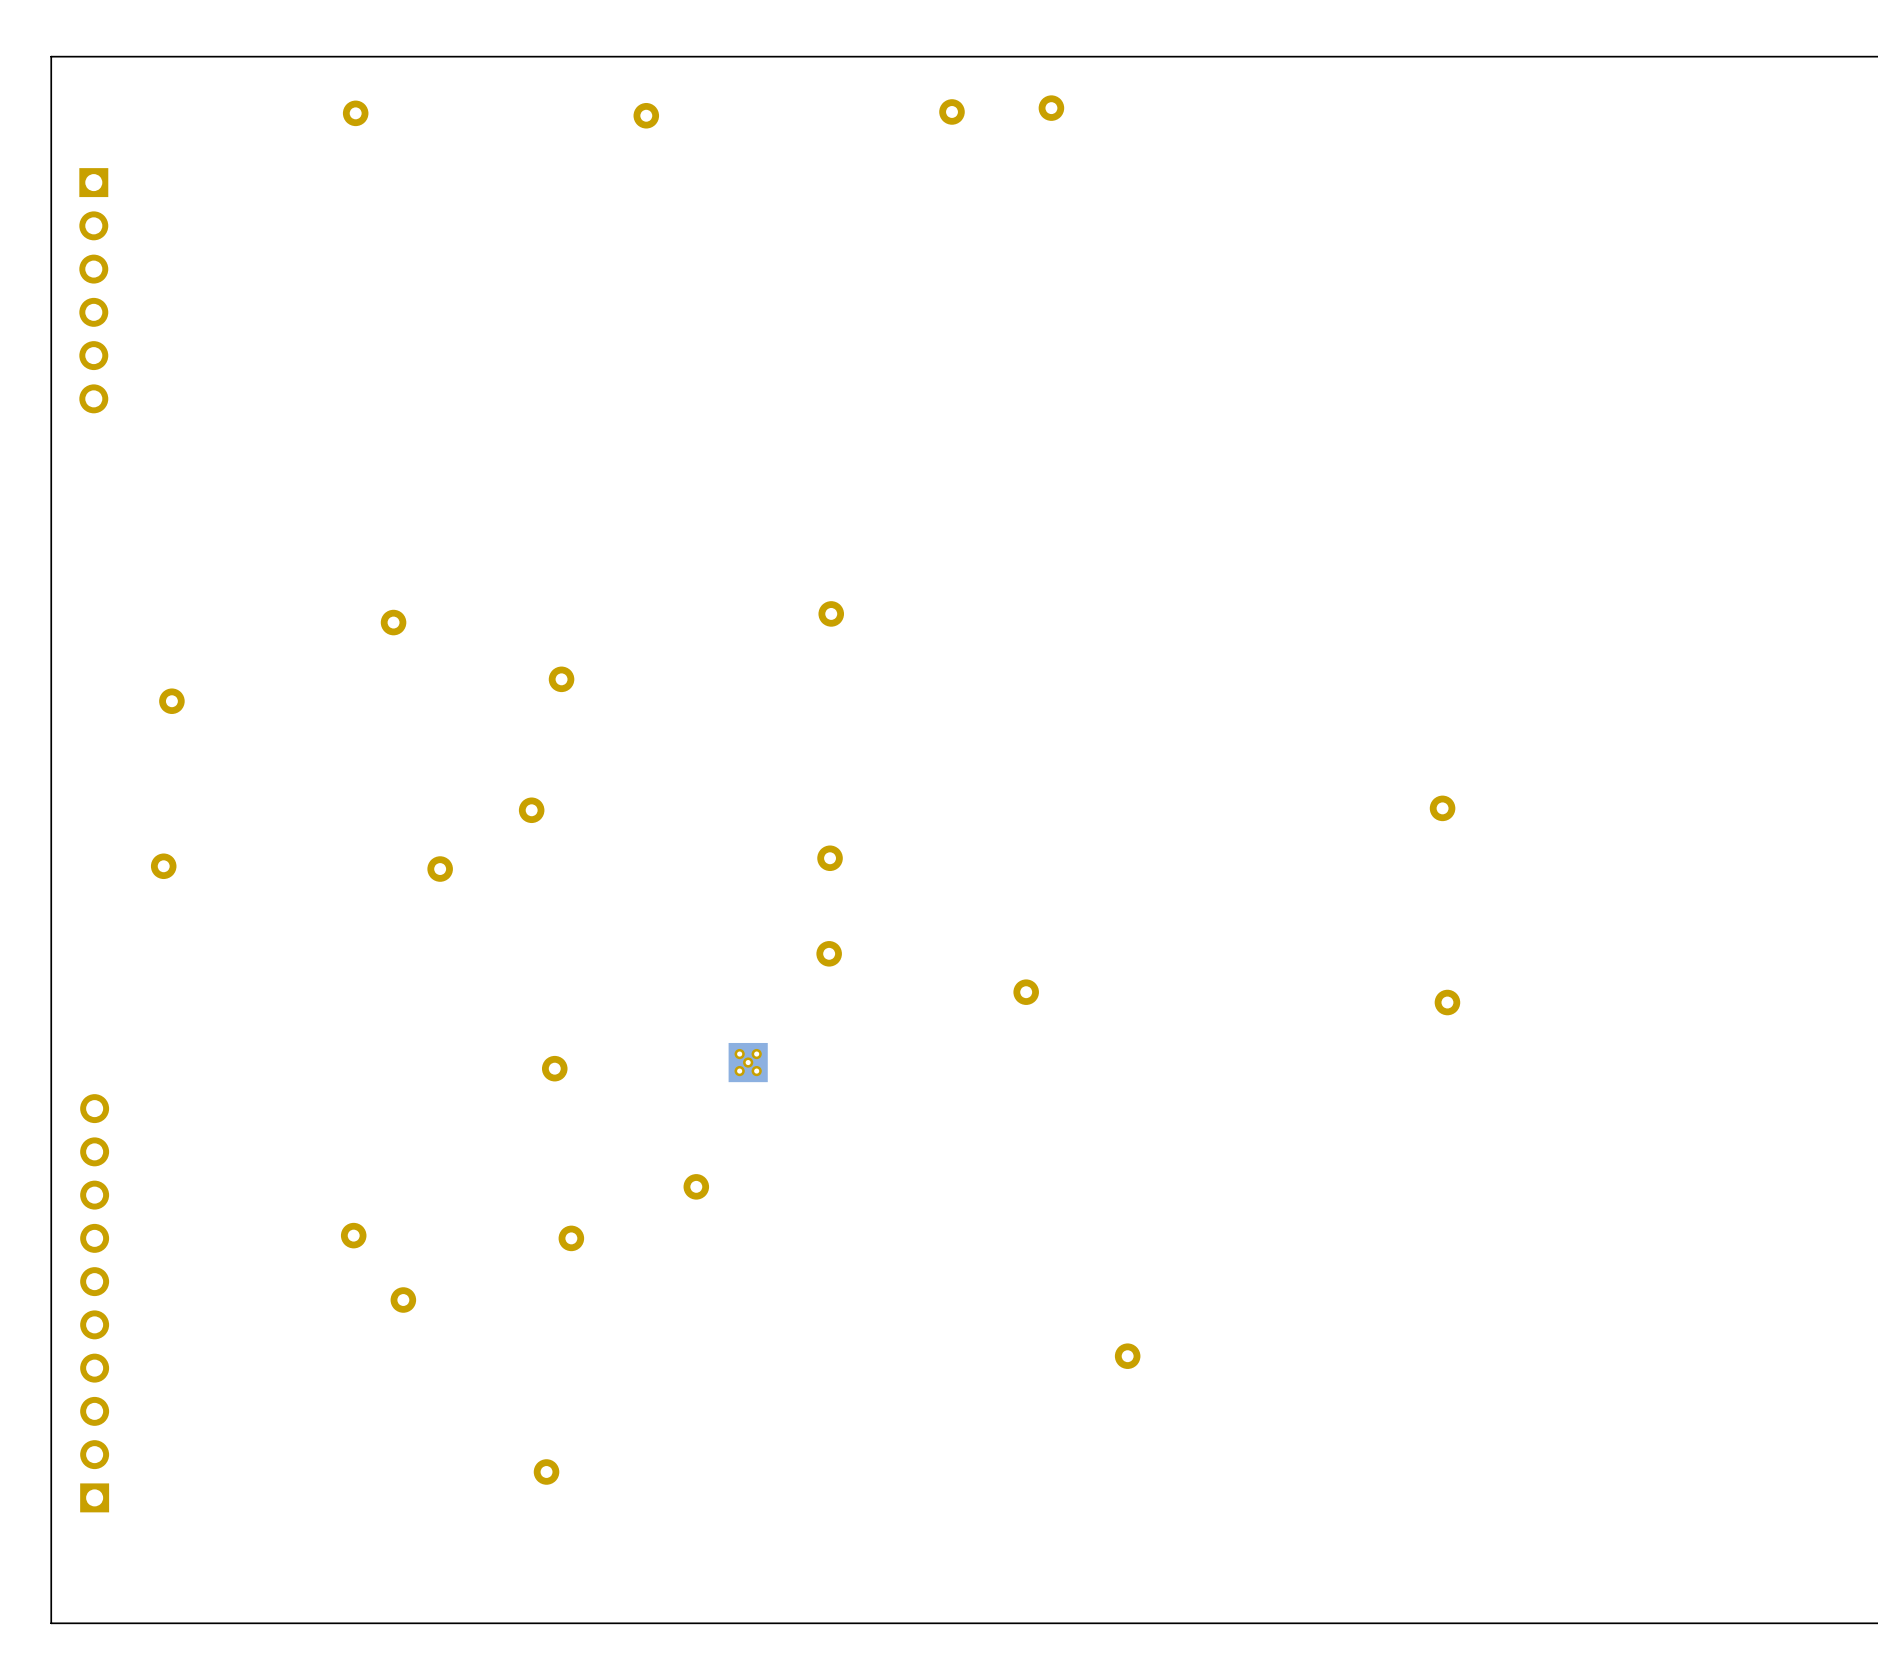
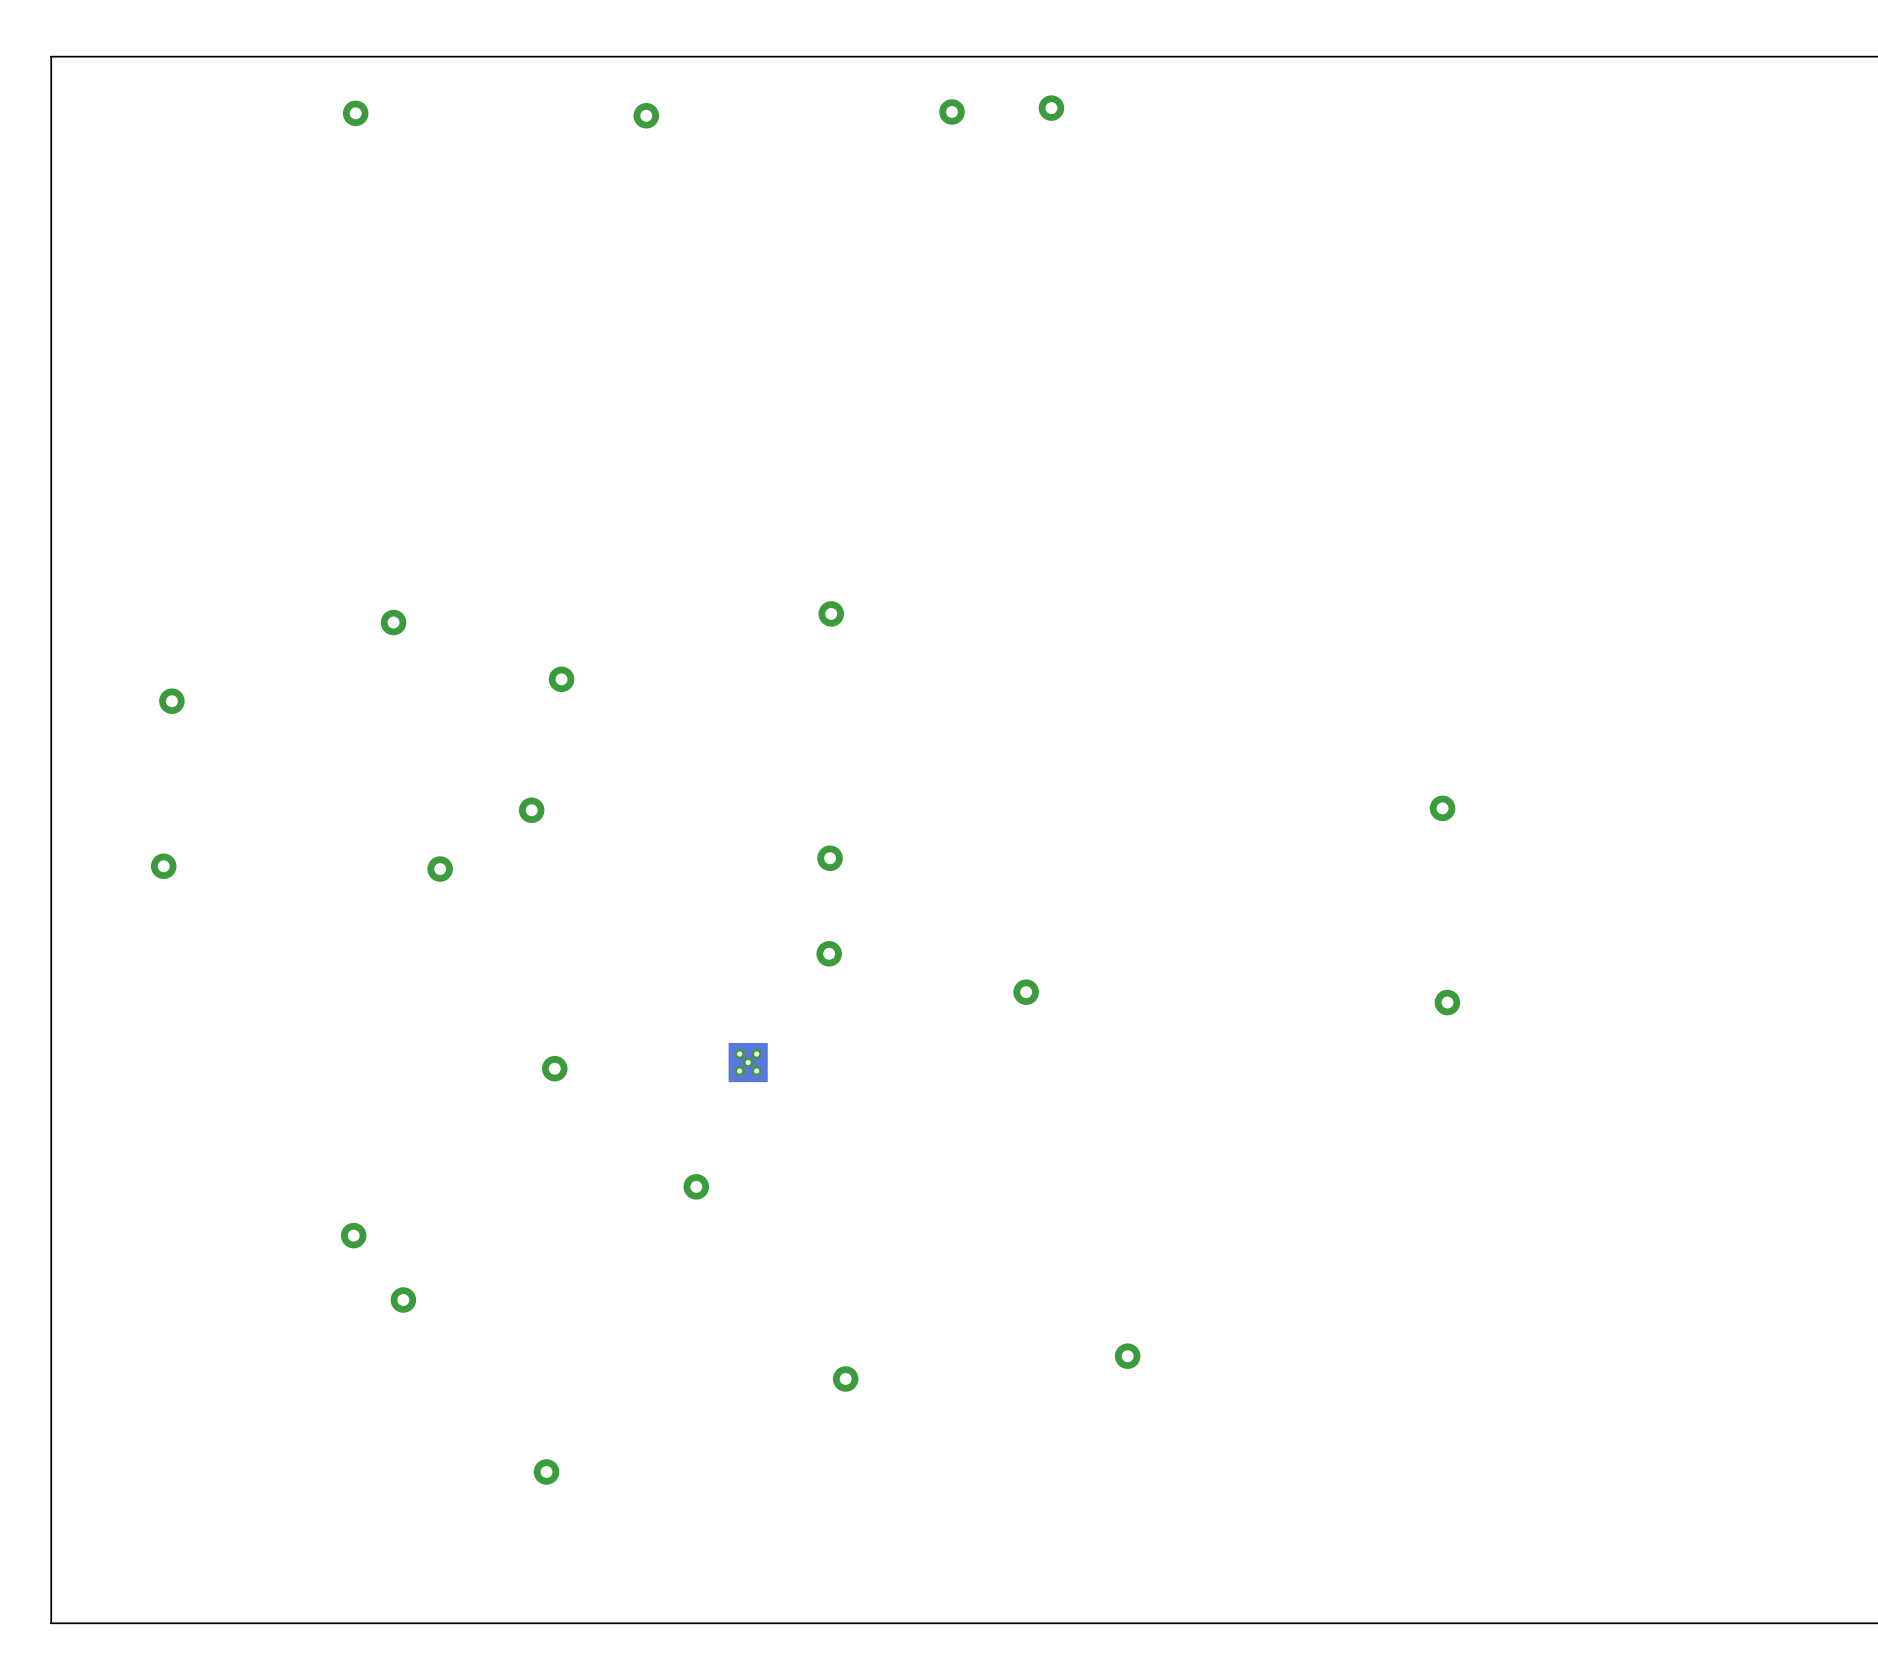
part: (93, 290) -> none
part position: (571, 1238) -> (845, 1378)
part: (94, 1303) -> none

